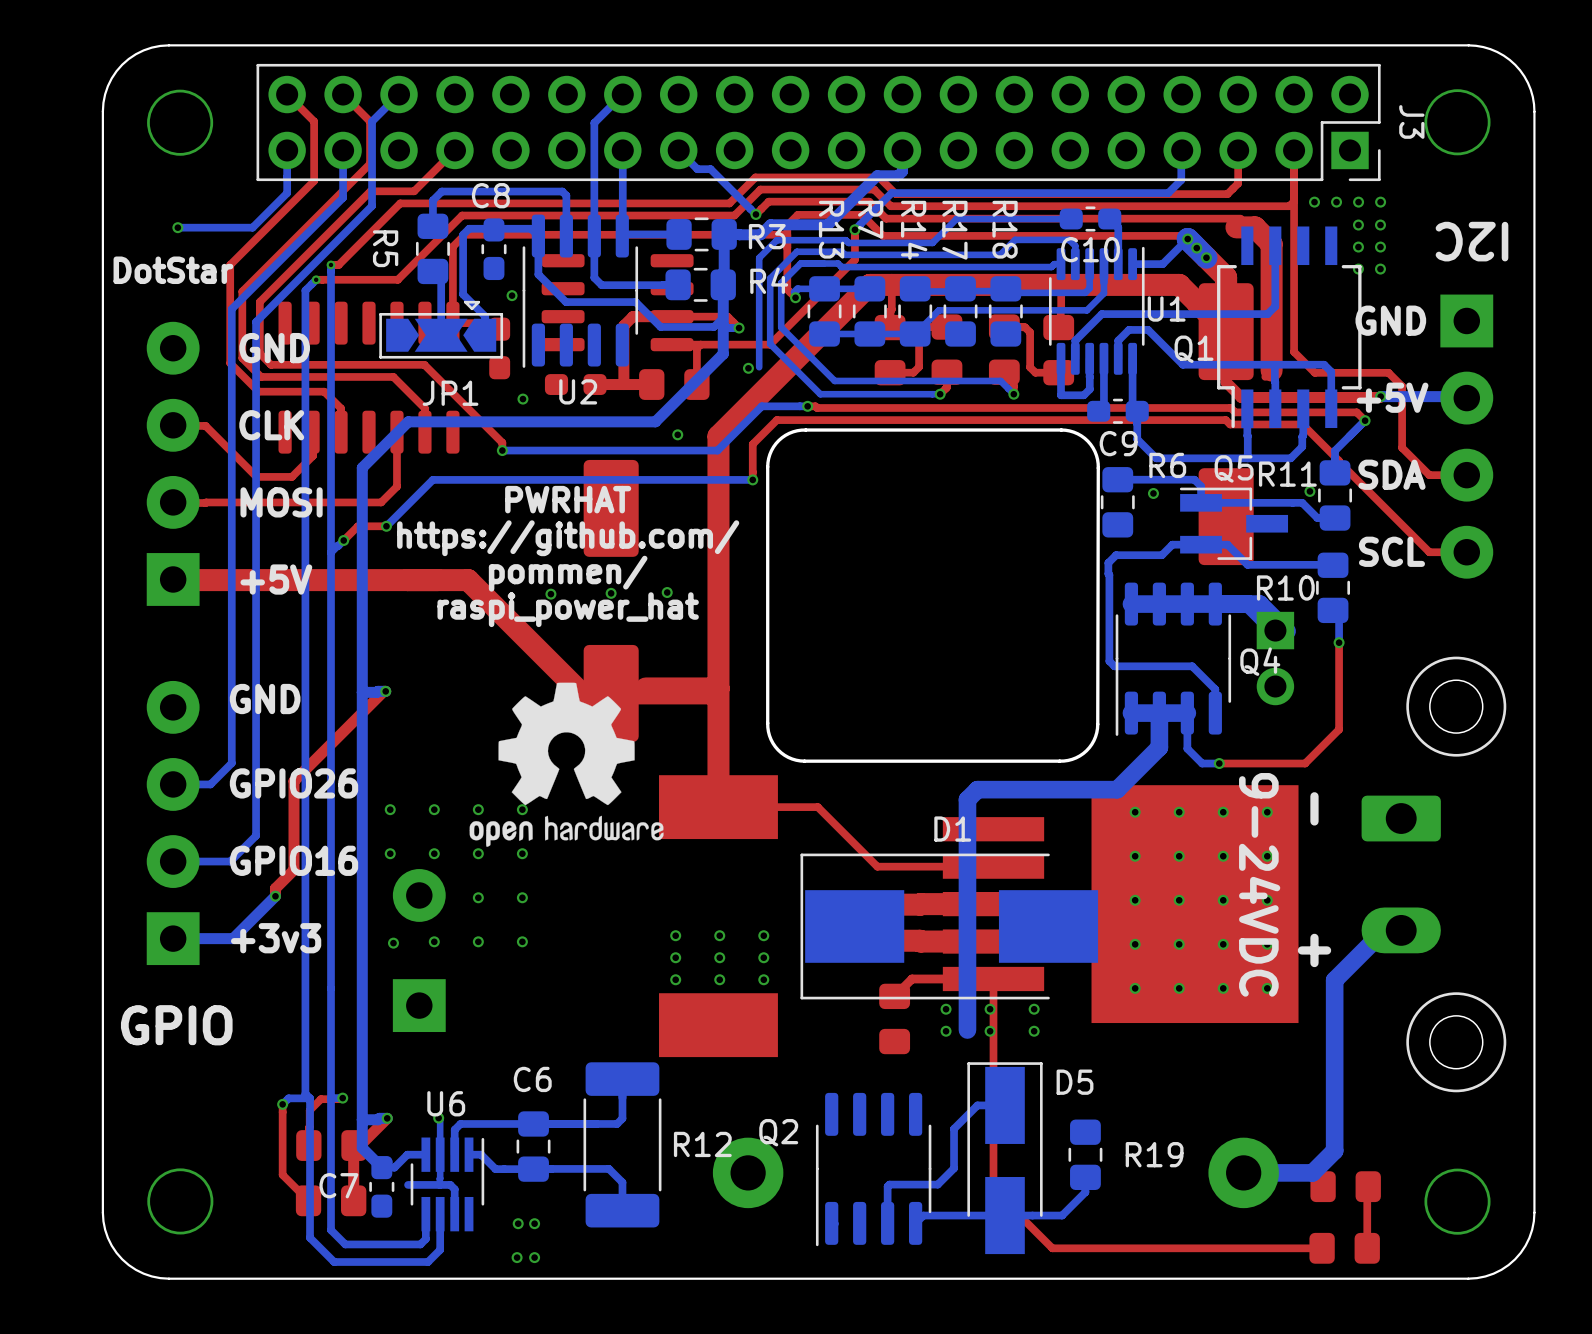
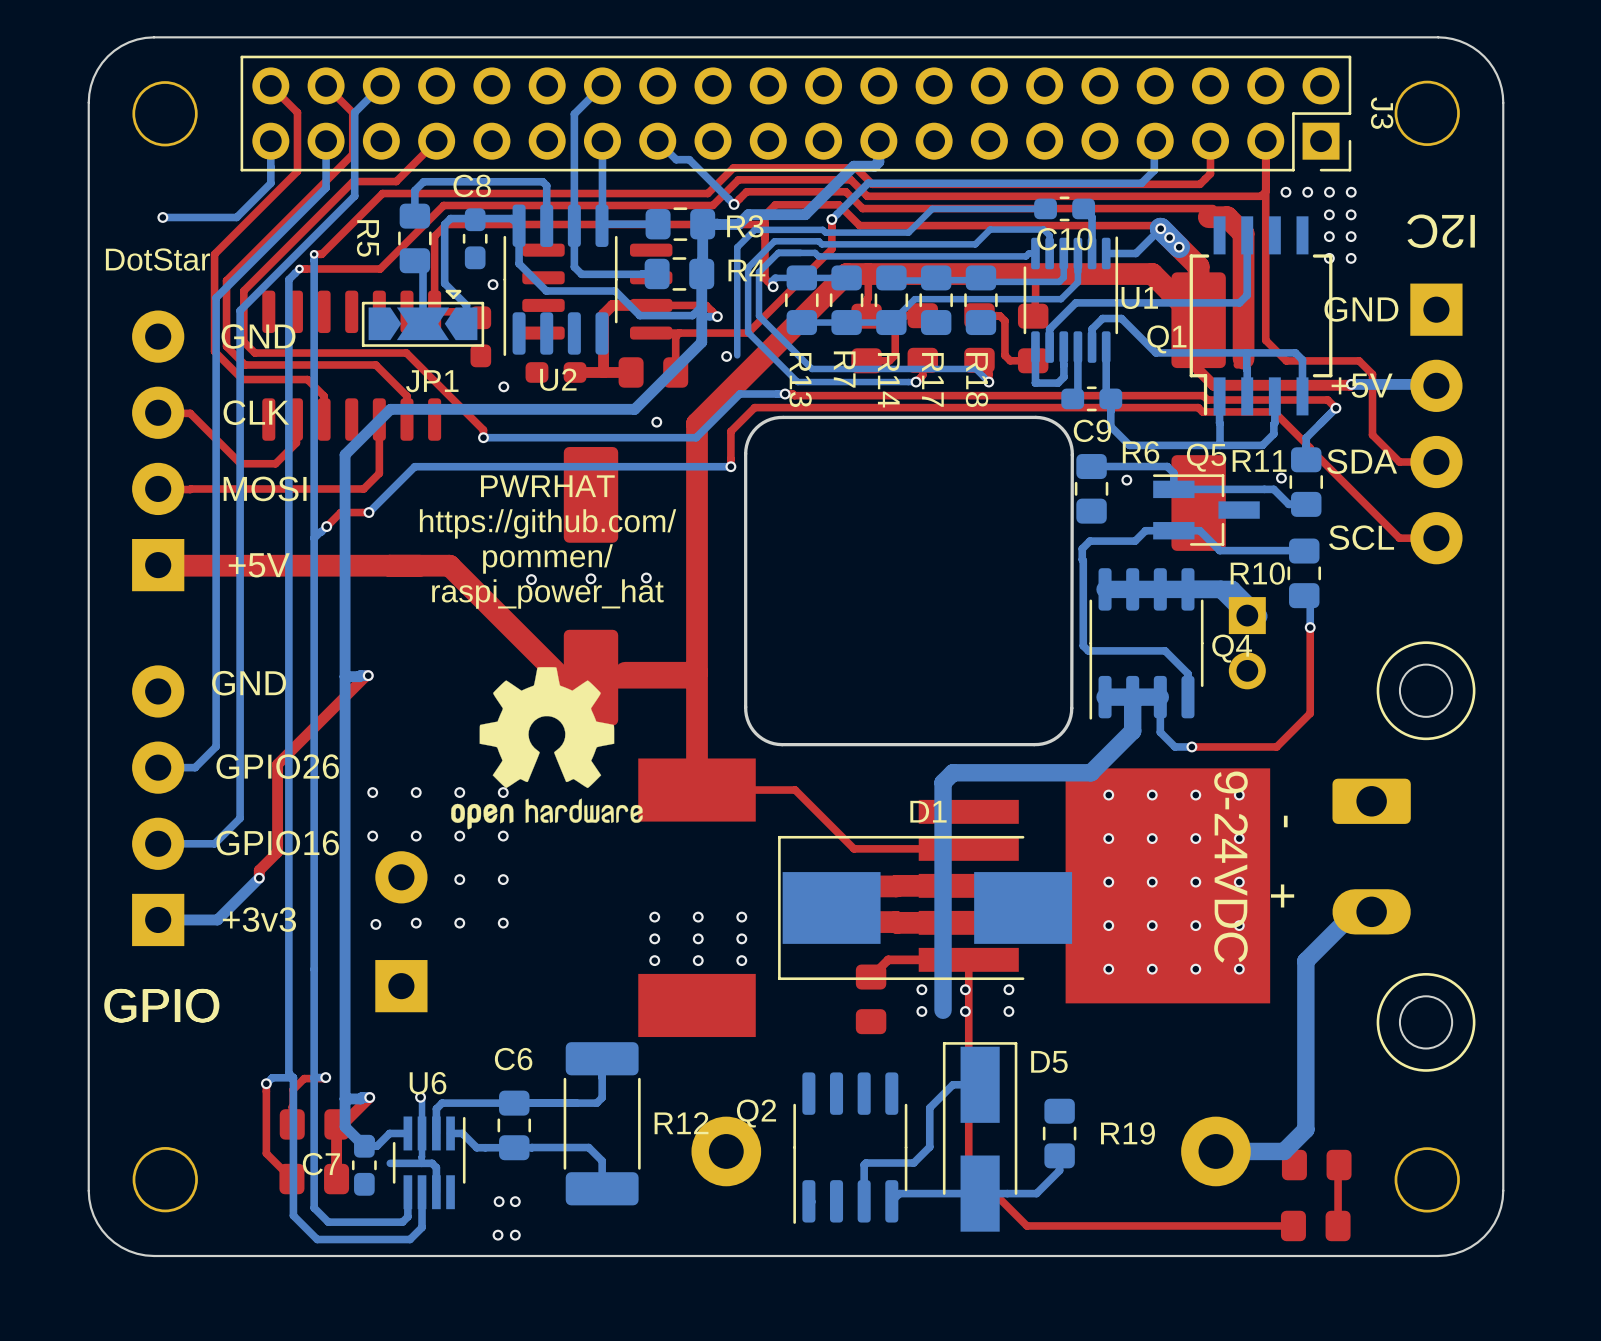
R7 name position: R7 (870, 219) -> R7 (844, 369)
R13 name position: R13 (831, 229) -> R13 (800, 380)
R18 name position: R18 (1005, 229) -> R18 (977, 380)
R14 name position: R14 (914, 230) -> R14 (888, 380)
R17 name position: R17 (954, 230) -> R17 (932, 379)

